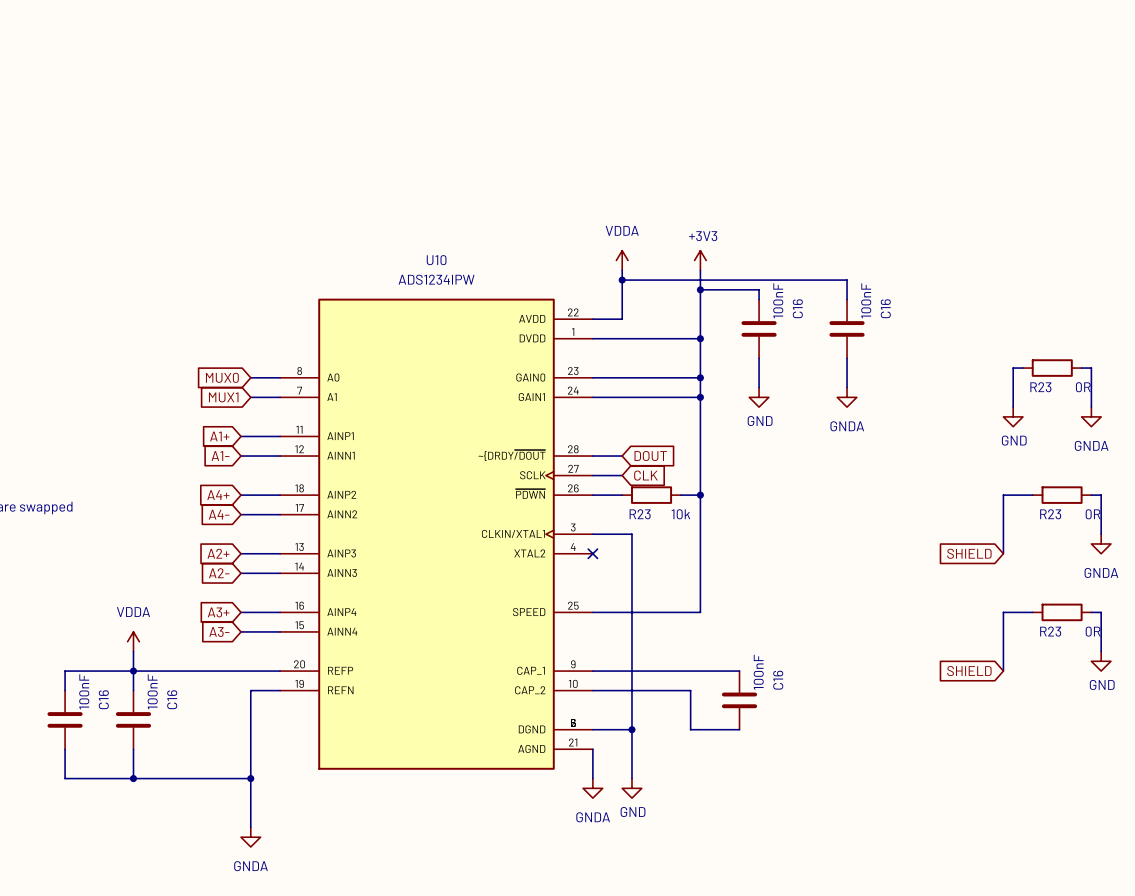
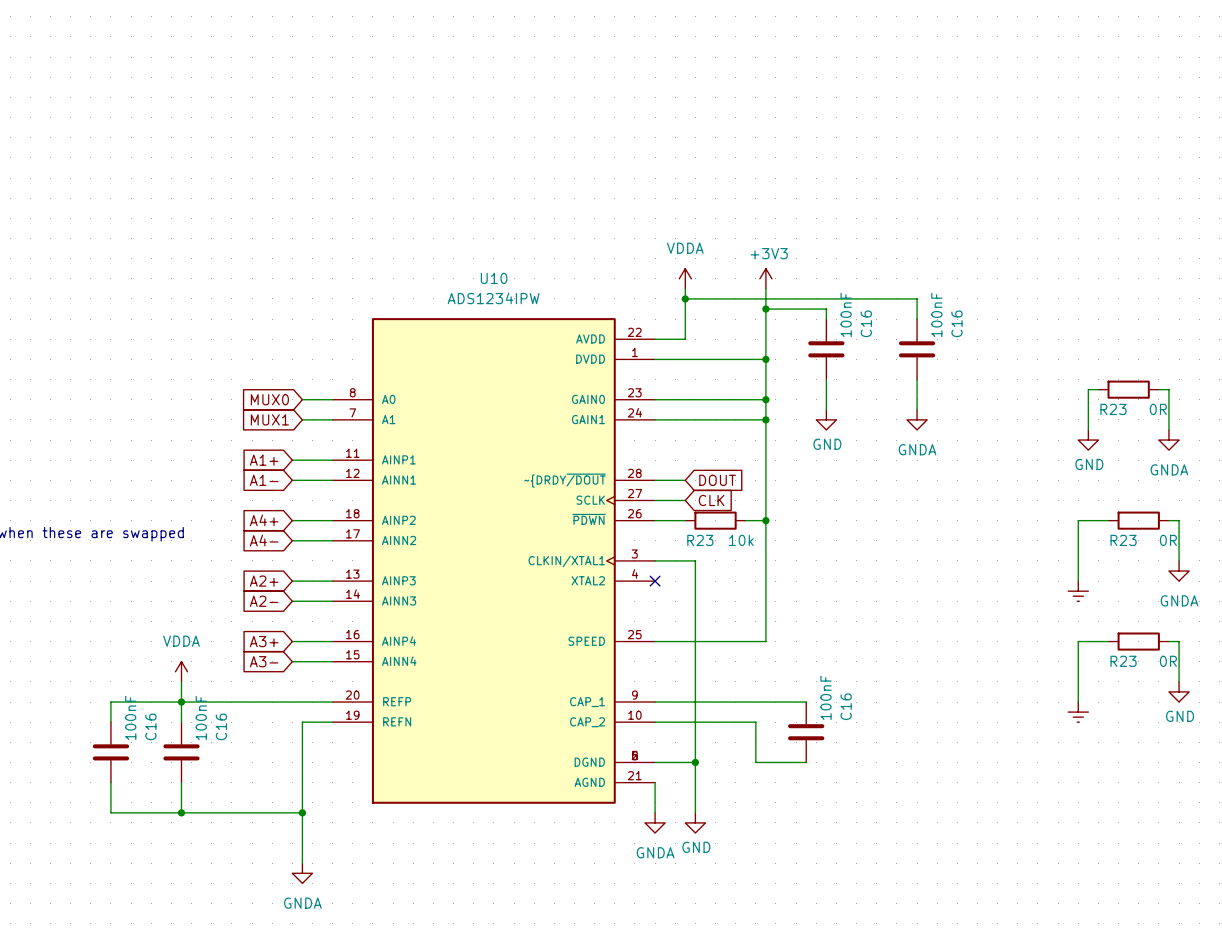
global label: SHIELD (969, 553) -> none
power symbol: none -> (1078, 591)
global label: SHIELD (969, 671) -> none
power symbol: none -> (1078, 712)

